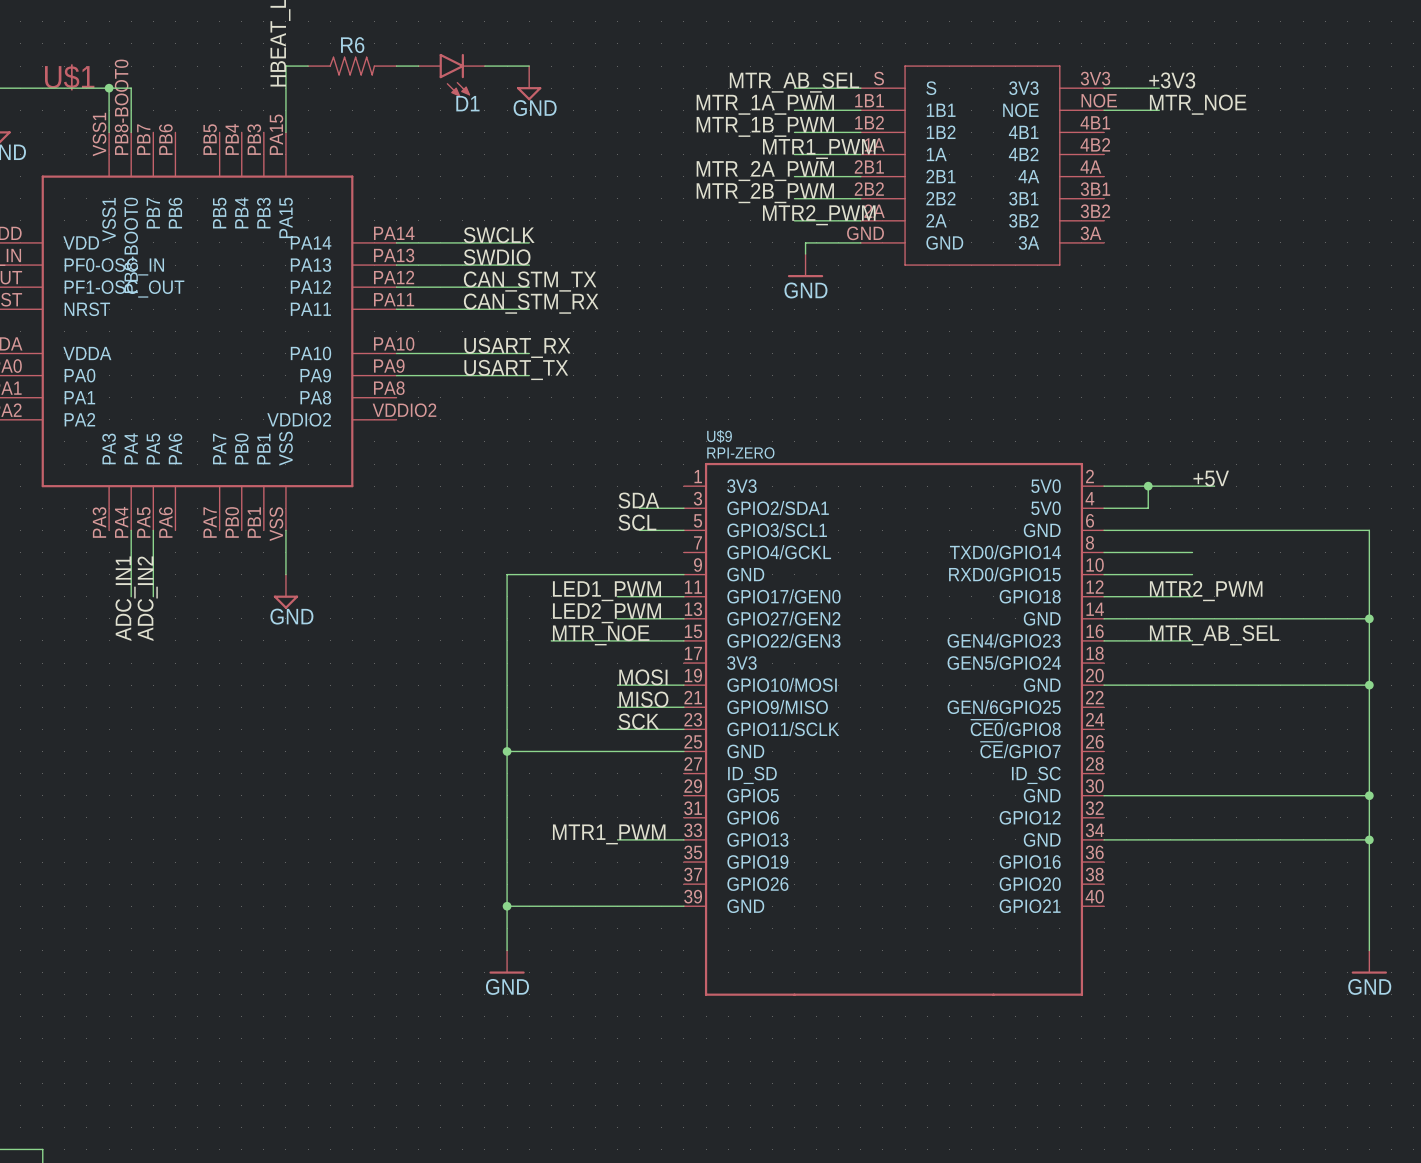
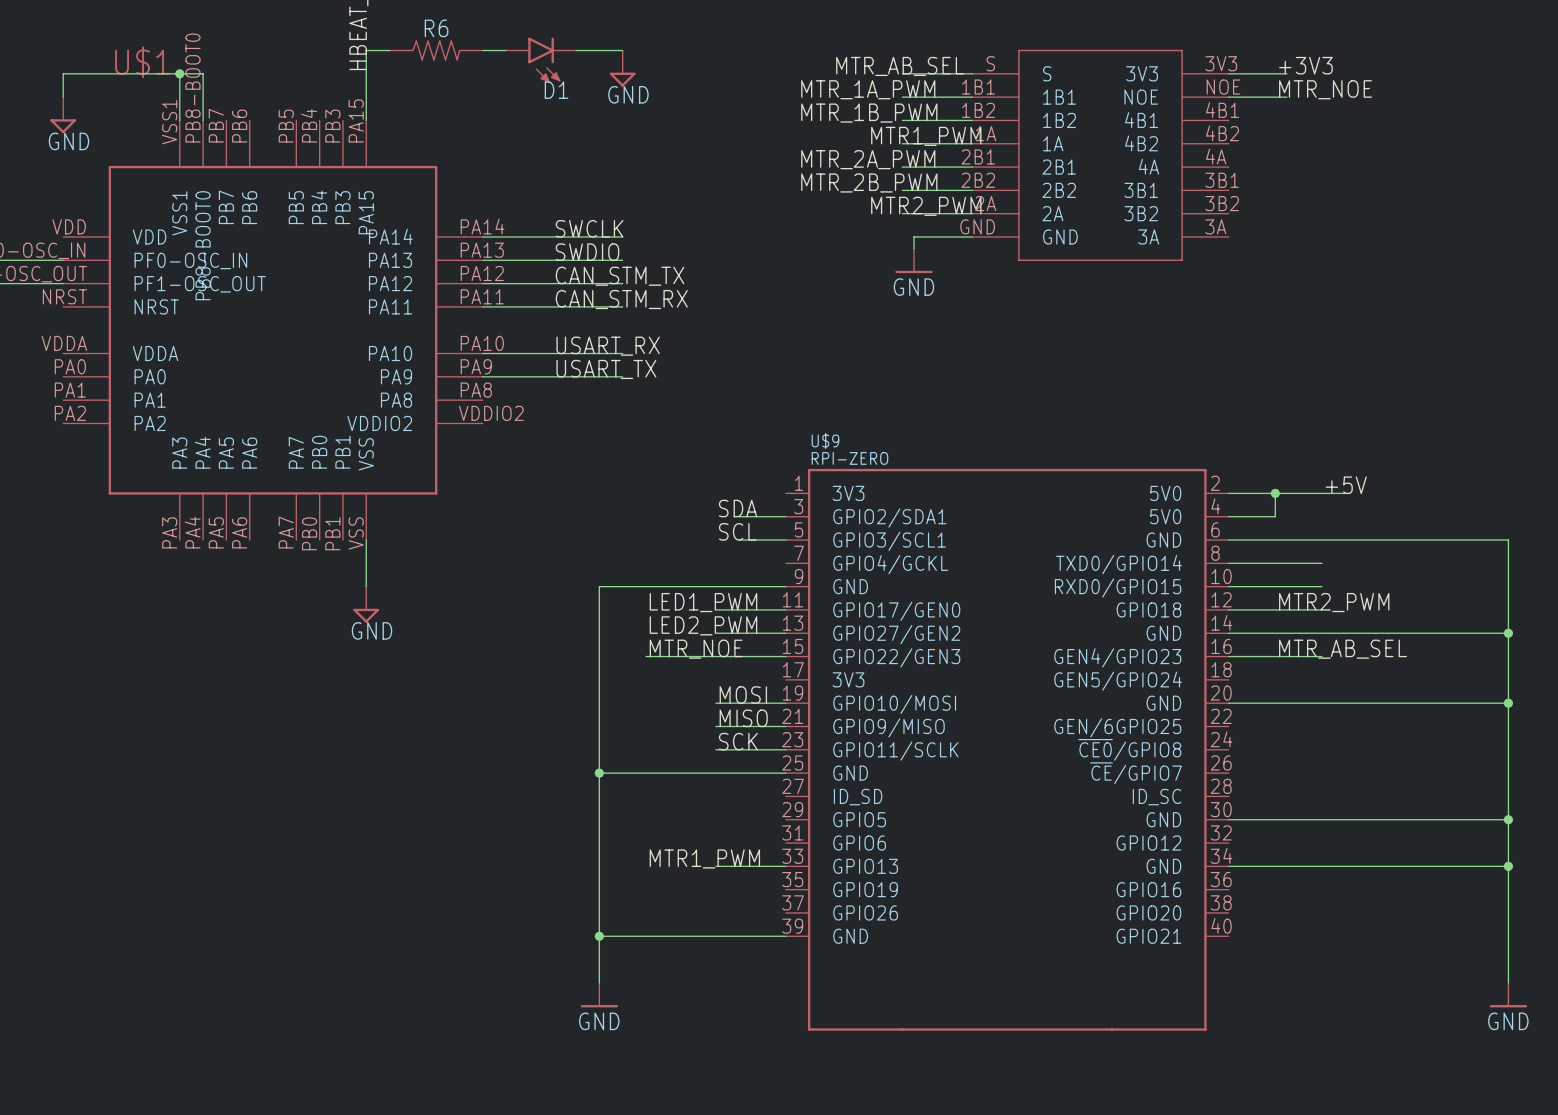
wire: (131, 530) (131, 596) -> none
wire: (153, 530) (153, 596) -> none
label: ADC_IN1 (125, 598) -> none
label: ADC_IN2 (147, 598) -> none

